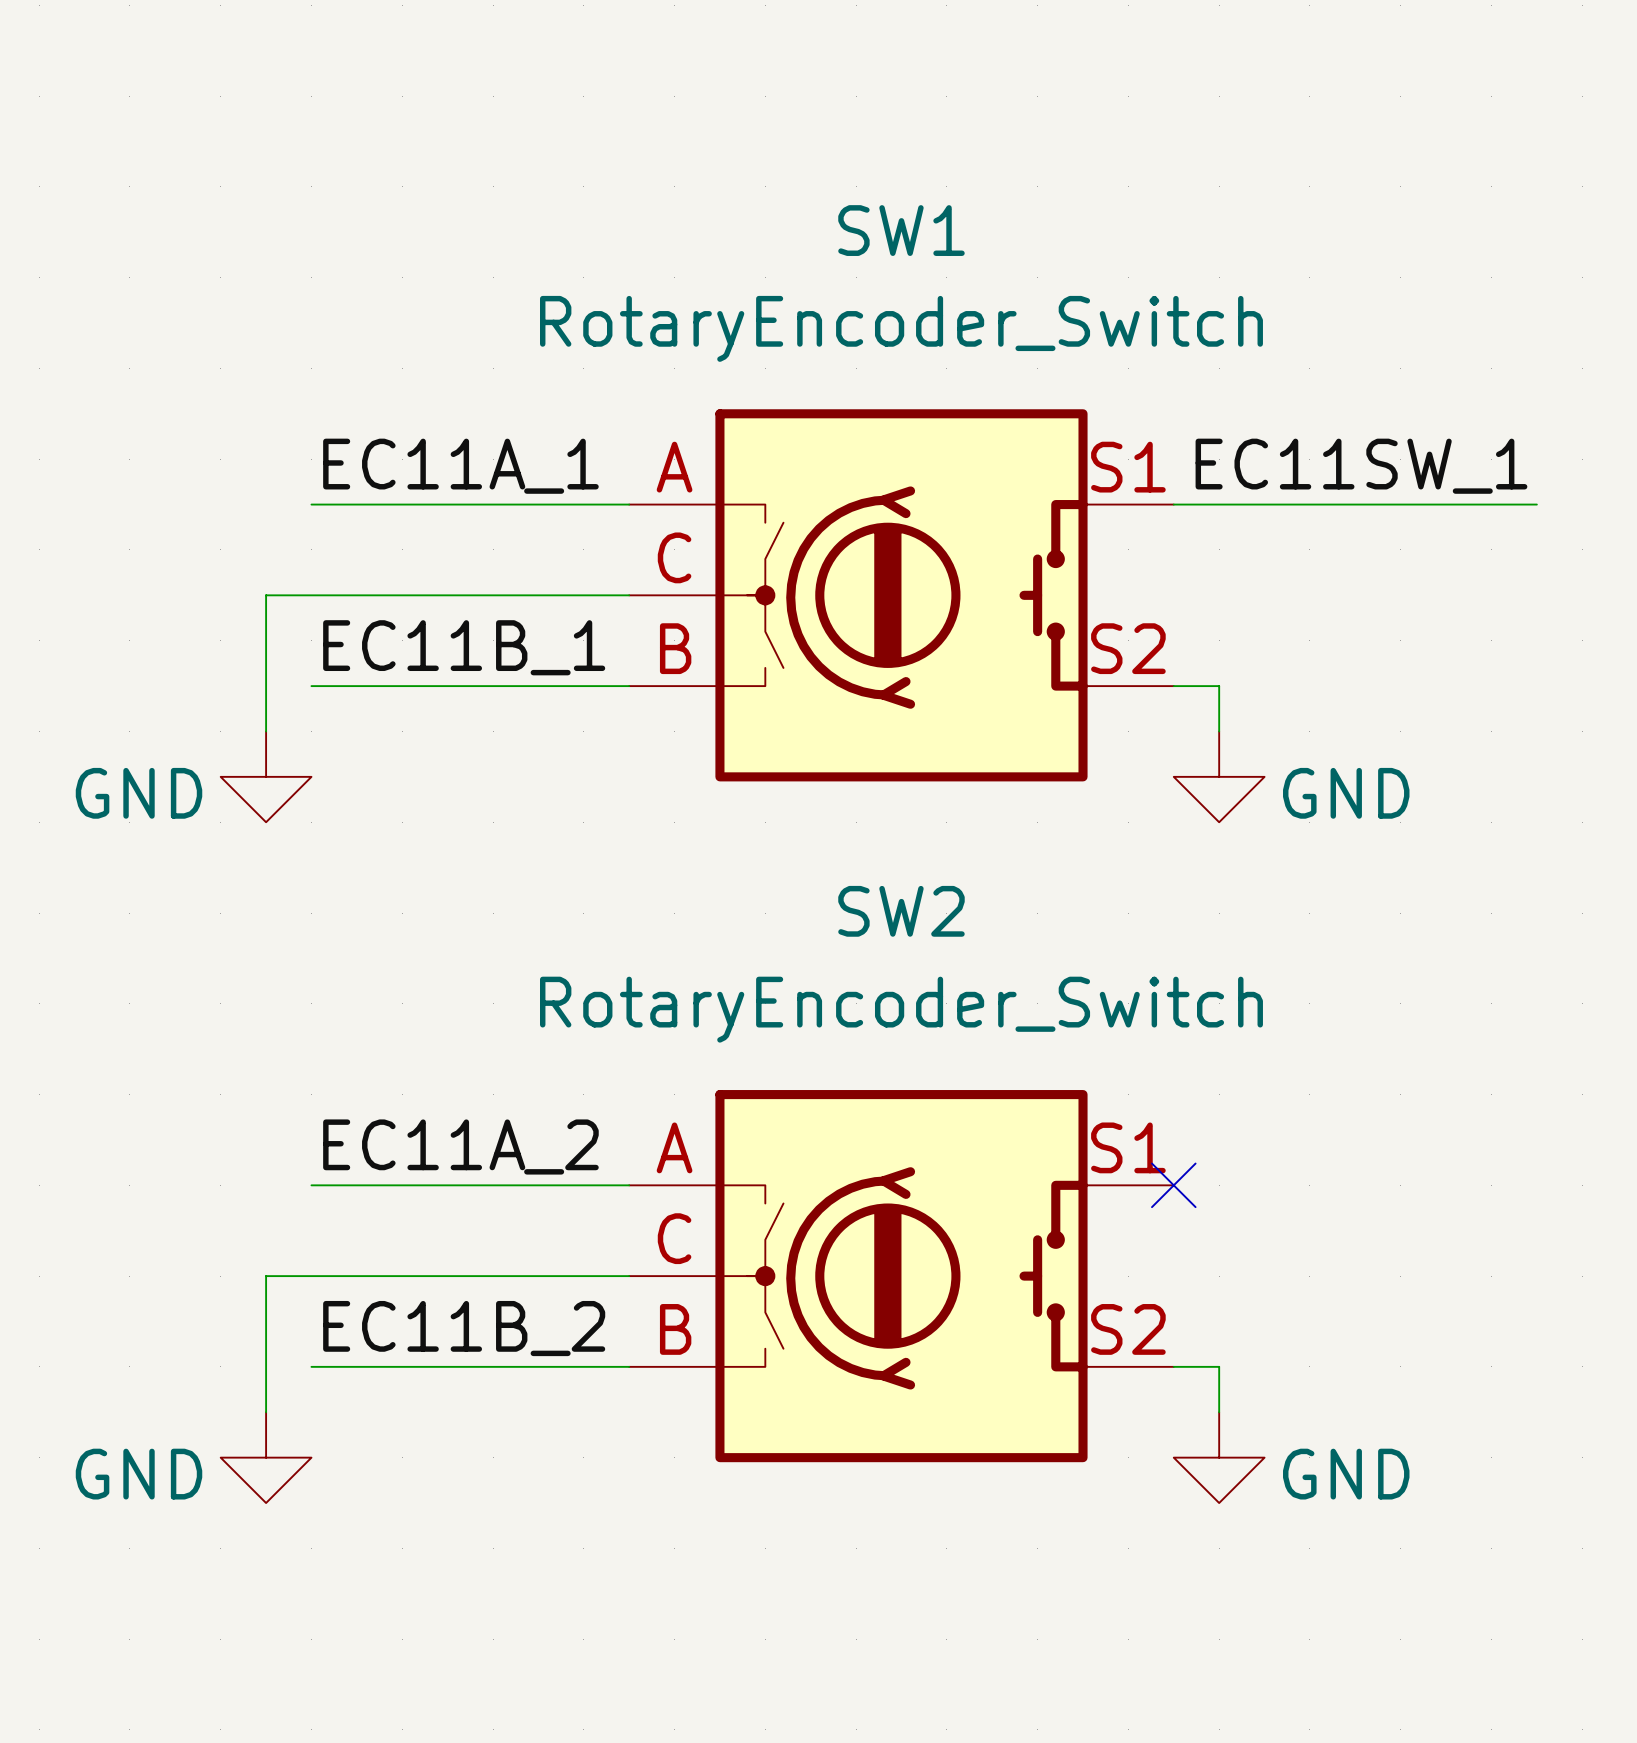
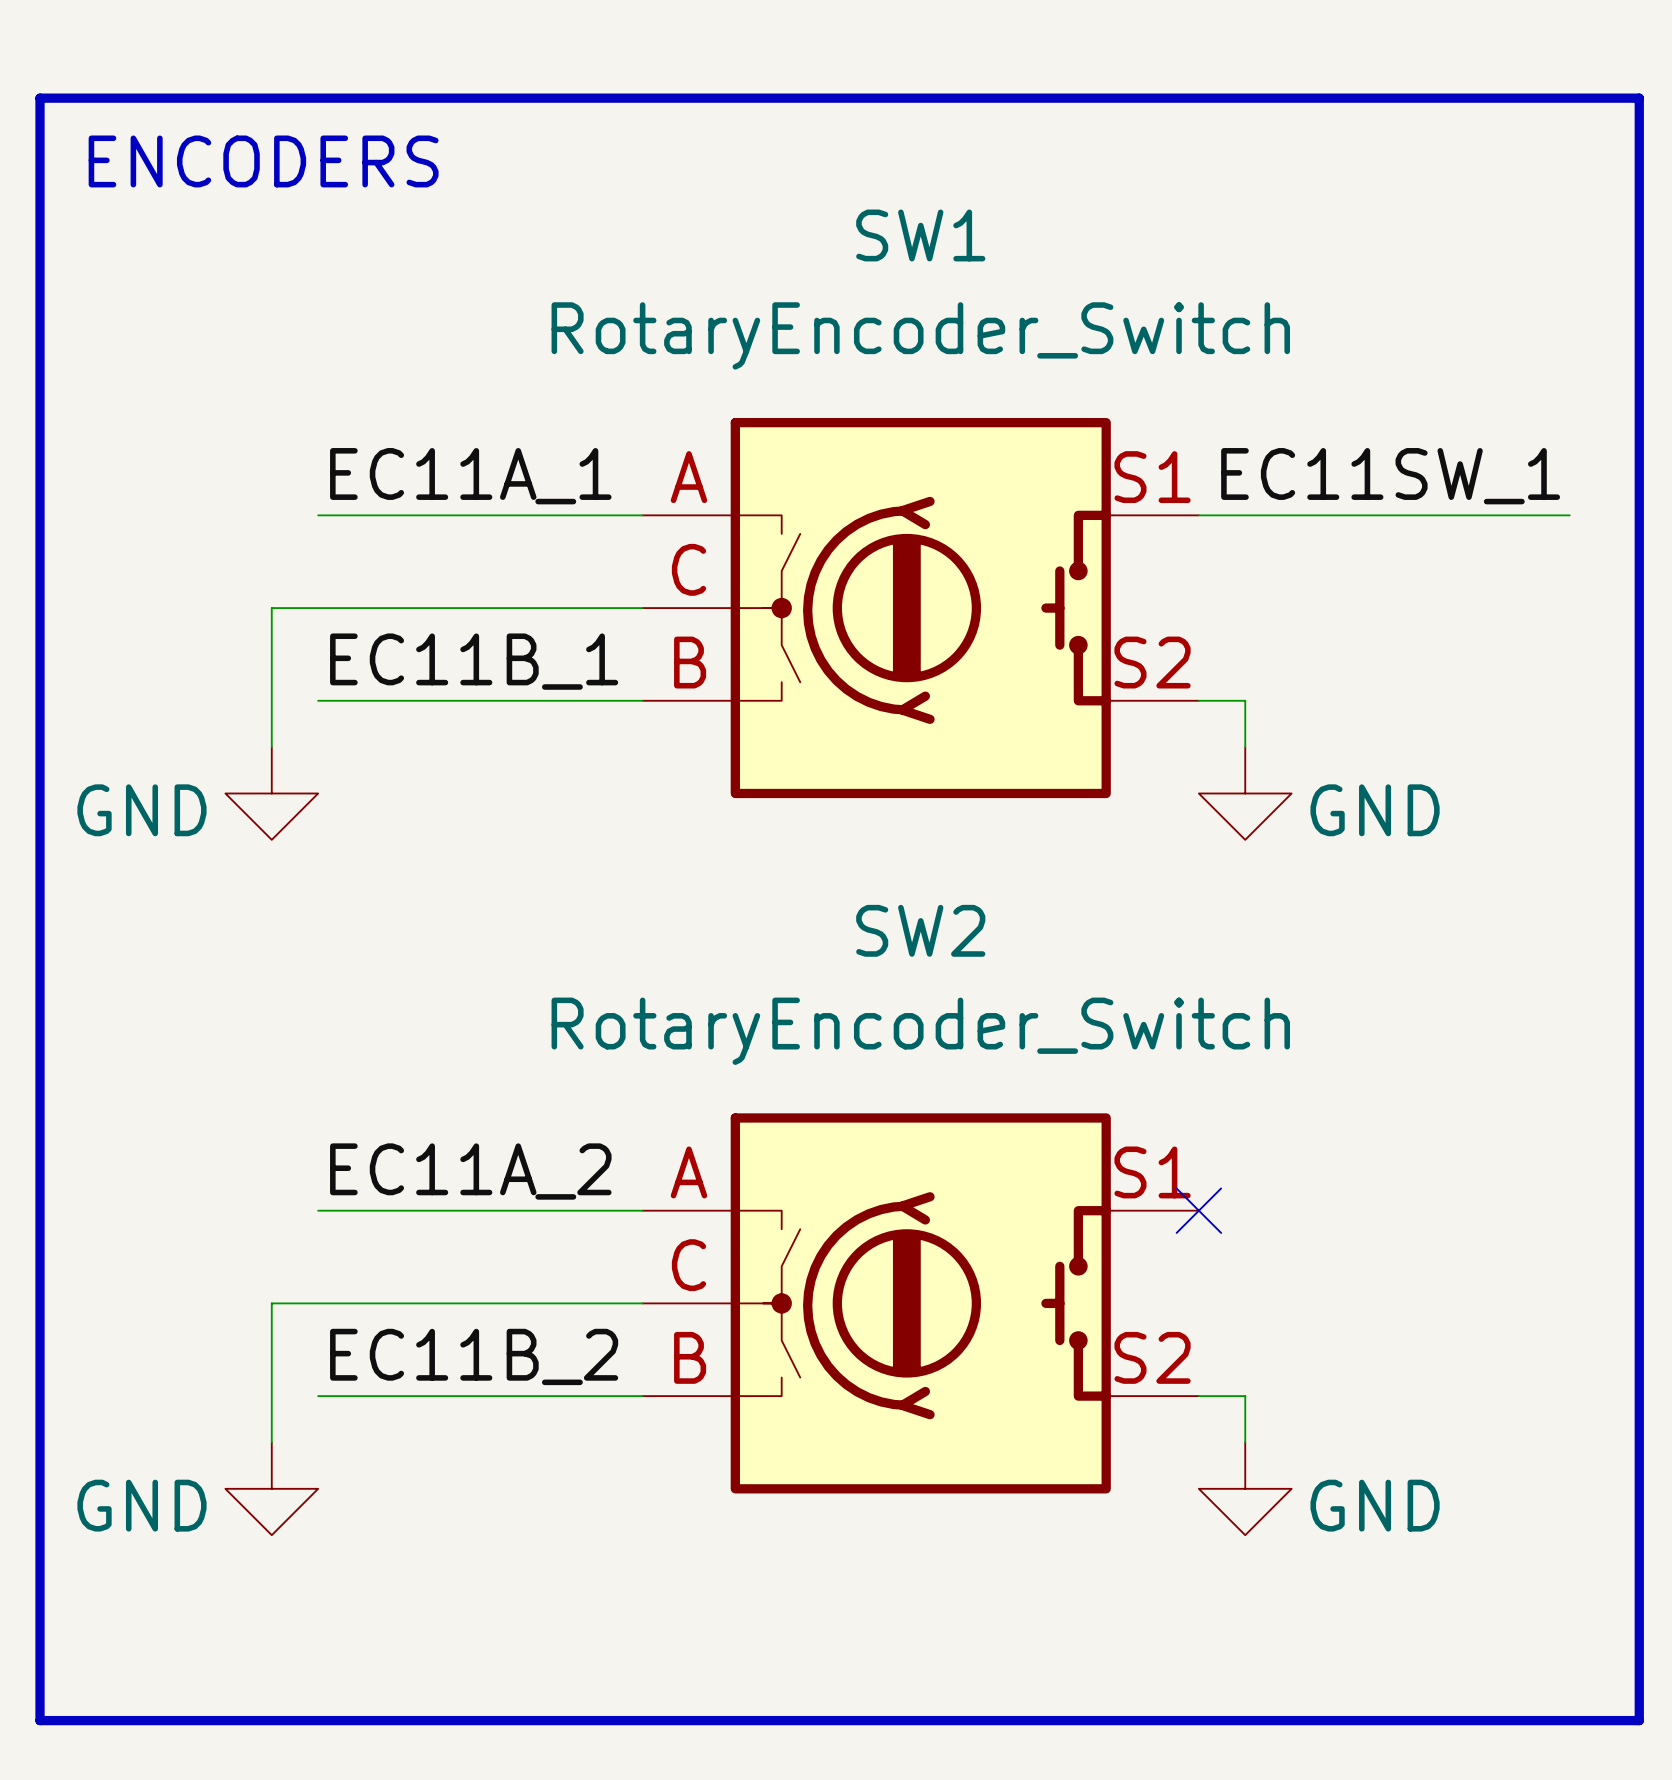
line: none -> (40, 98) (1639, 98) (1639, 1720) (40, 1720) (40, 98)
text: none -> ENCODERS (263, 161)

